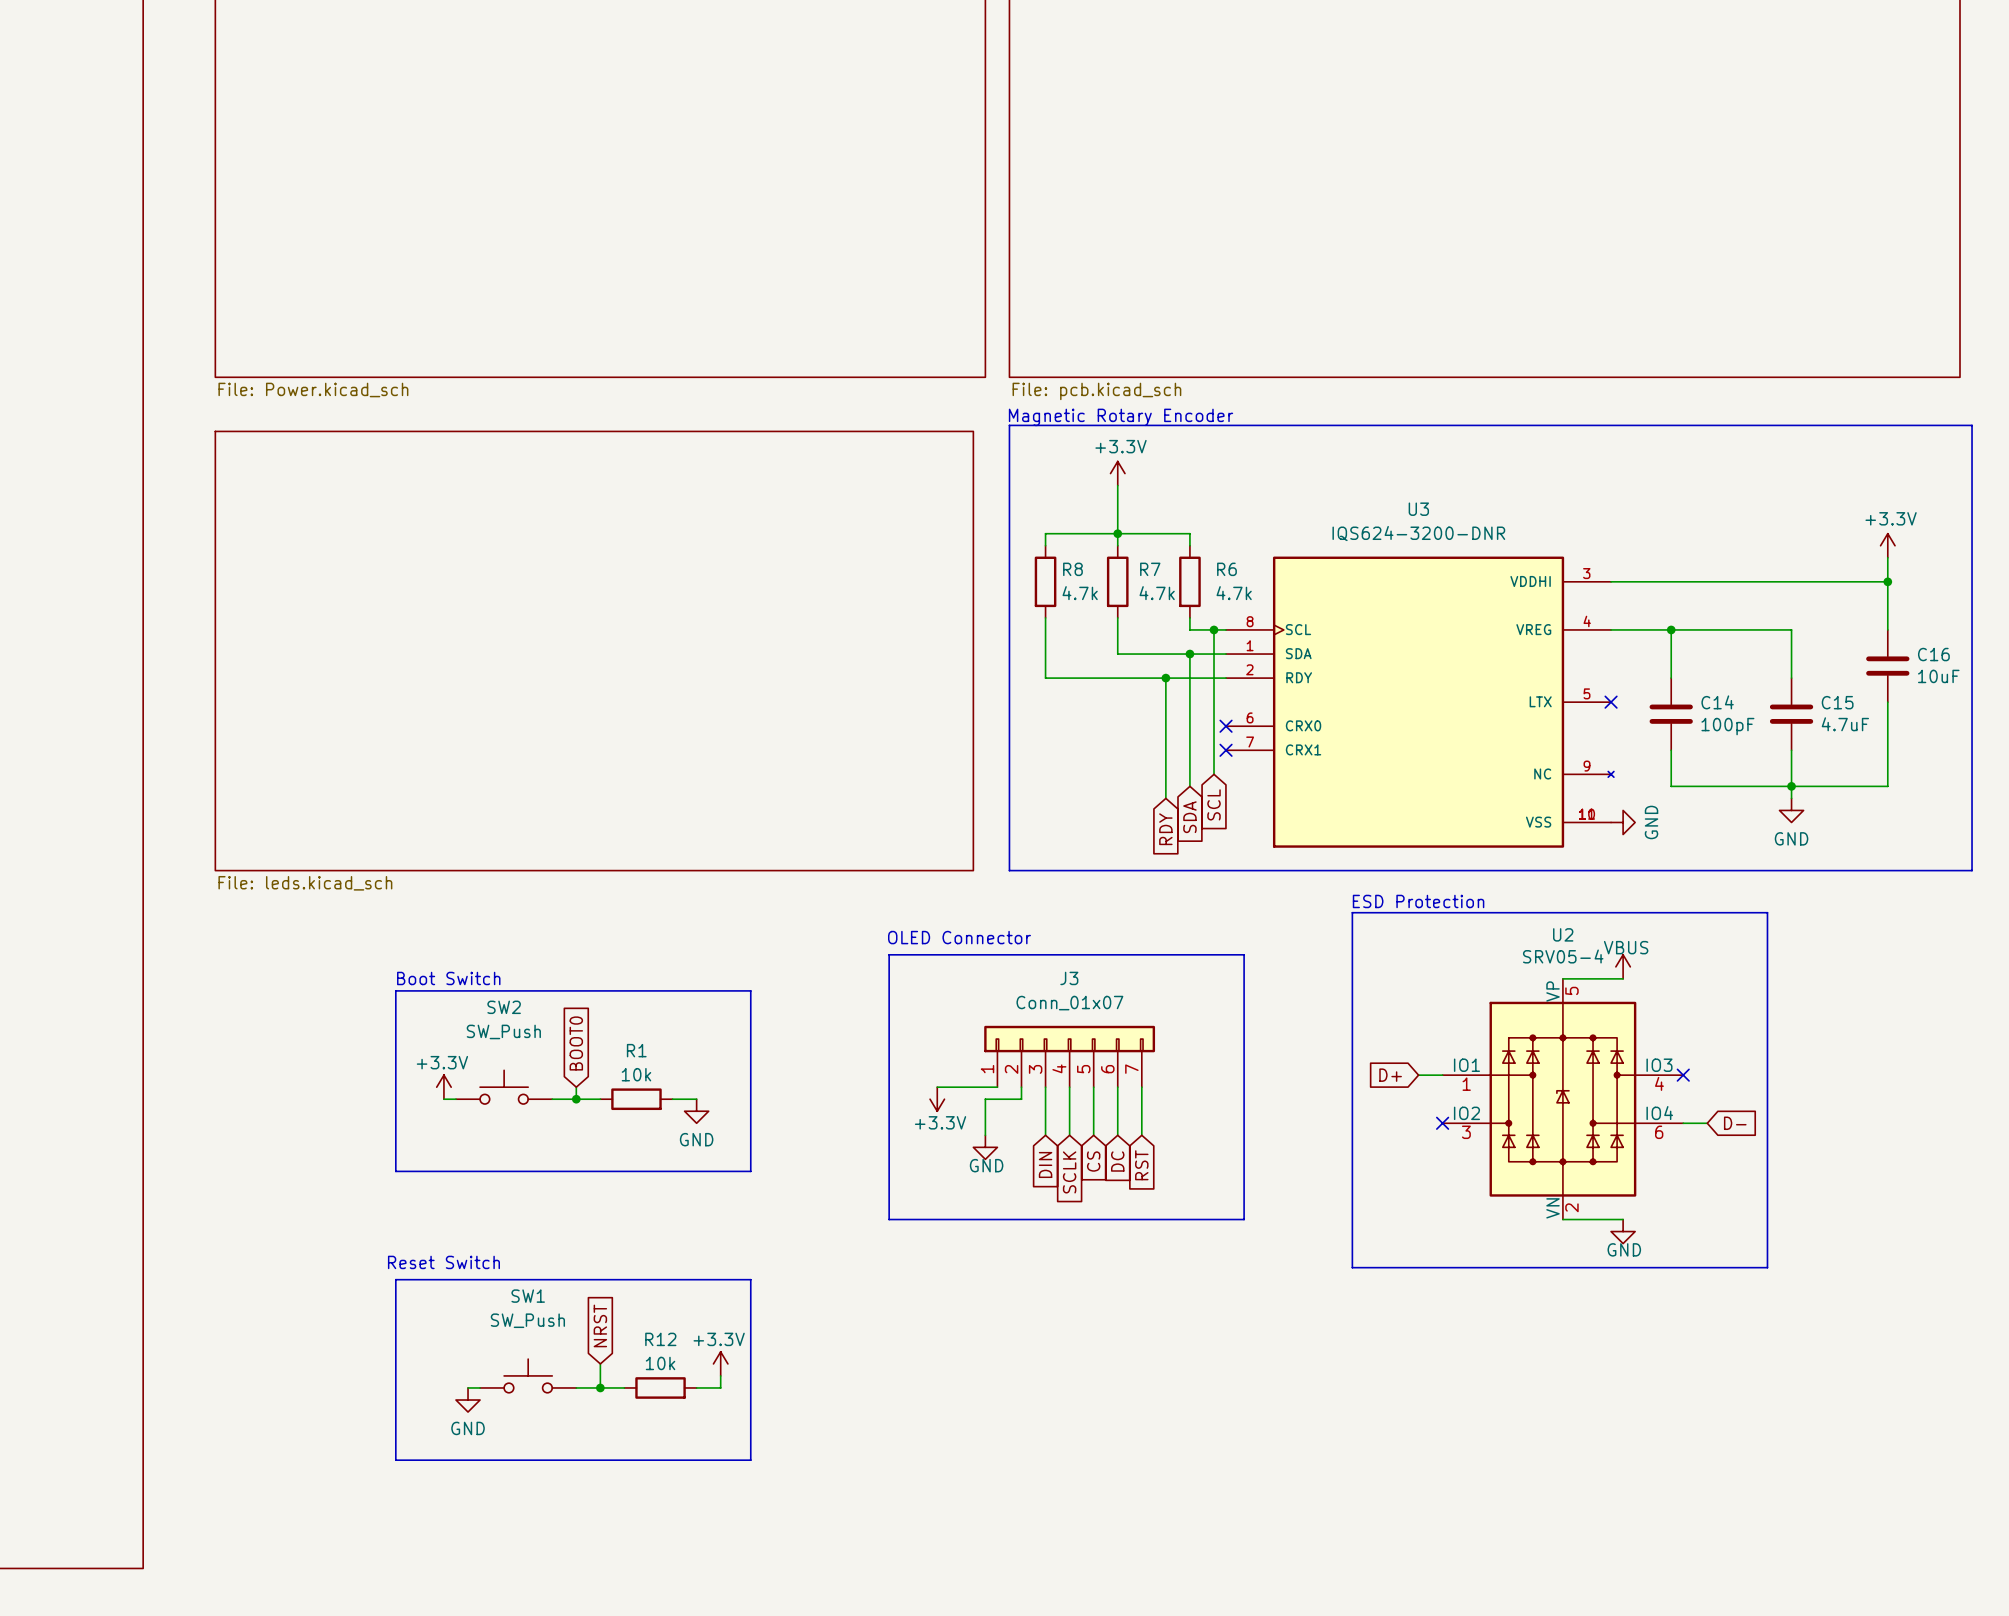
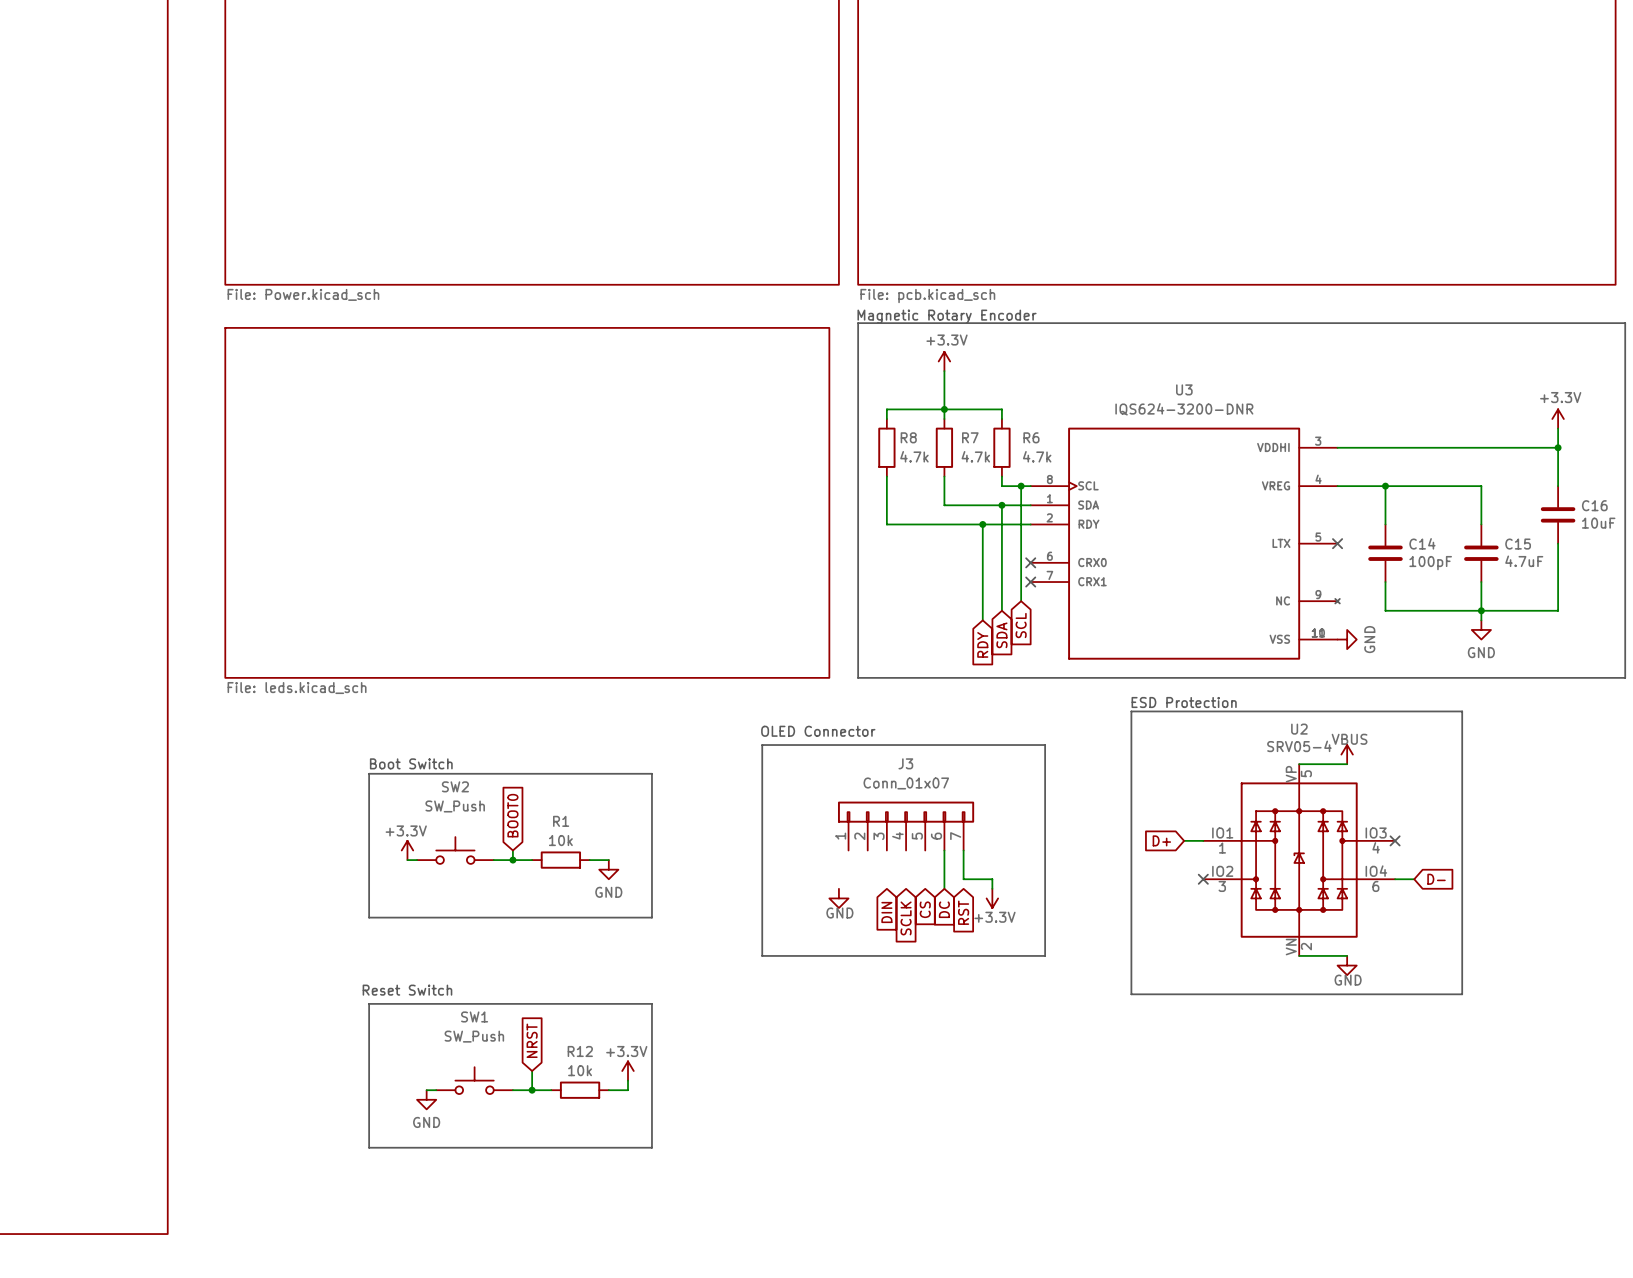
wire: (937, 1087) (997, 1087) -> none
wire: (1021, 1087) (1021, 1099) (985, 1099) (985, 1135) -> none
wire: (1045, 1087) (1045, 1135) -> none
wire: (1069, 1087) (1069, 1135) -> none
wire: (1093, 1087) (1093, 1135) -> none
power symbol: +3.3V (937, 1099) -> none
wire: (1141, 1123) (1141, 1135) -> (963, 879) (992, 879) (992, 888)
power symbol: none -> +3.3V (992, 898)

